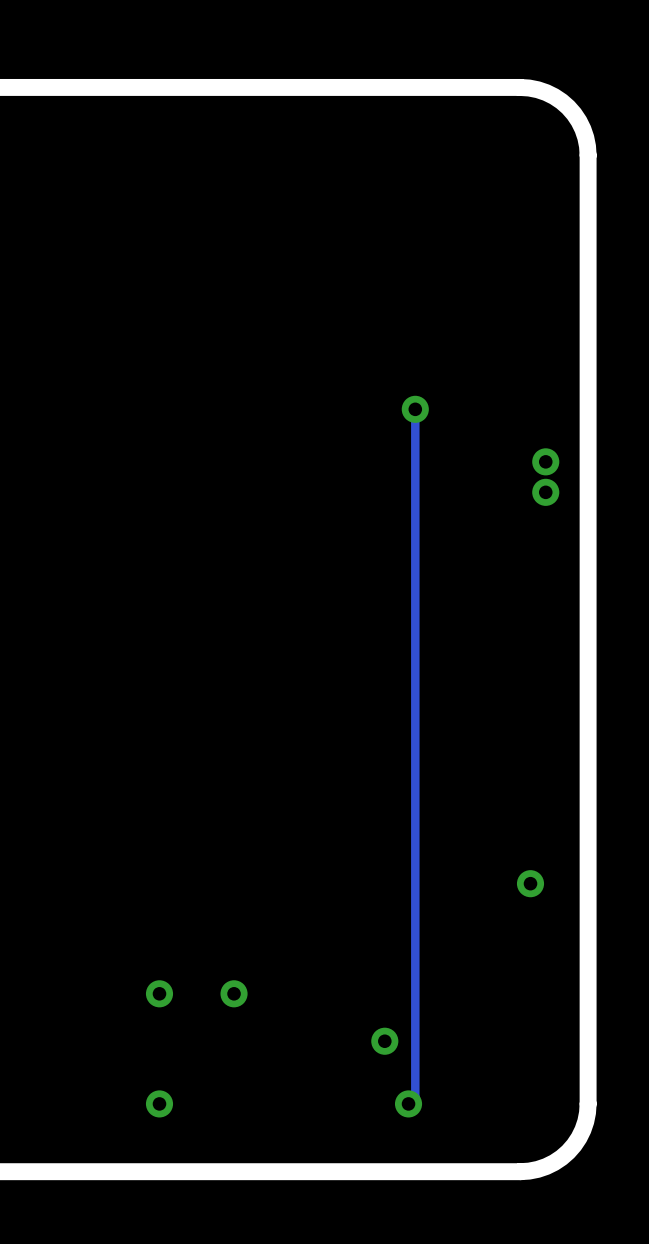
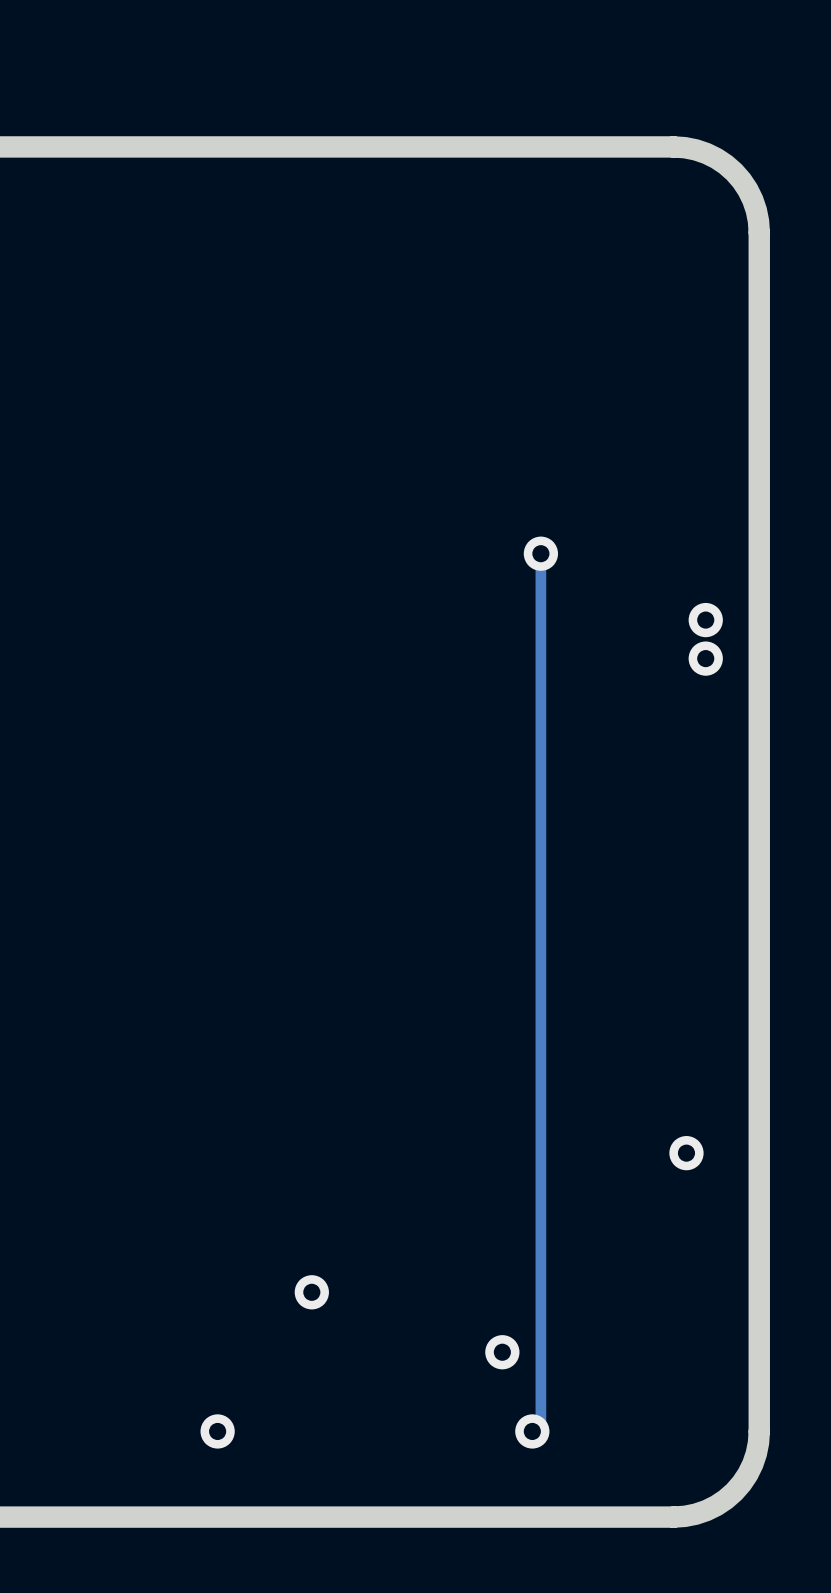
via: (159, 993) -> none

